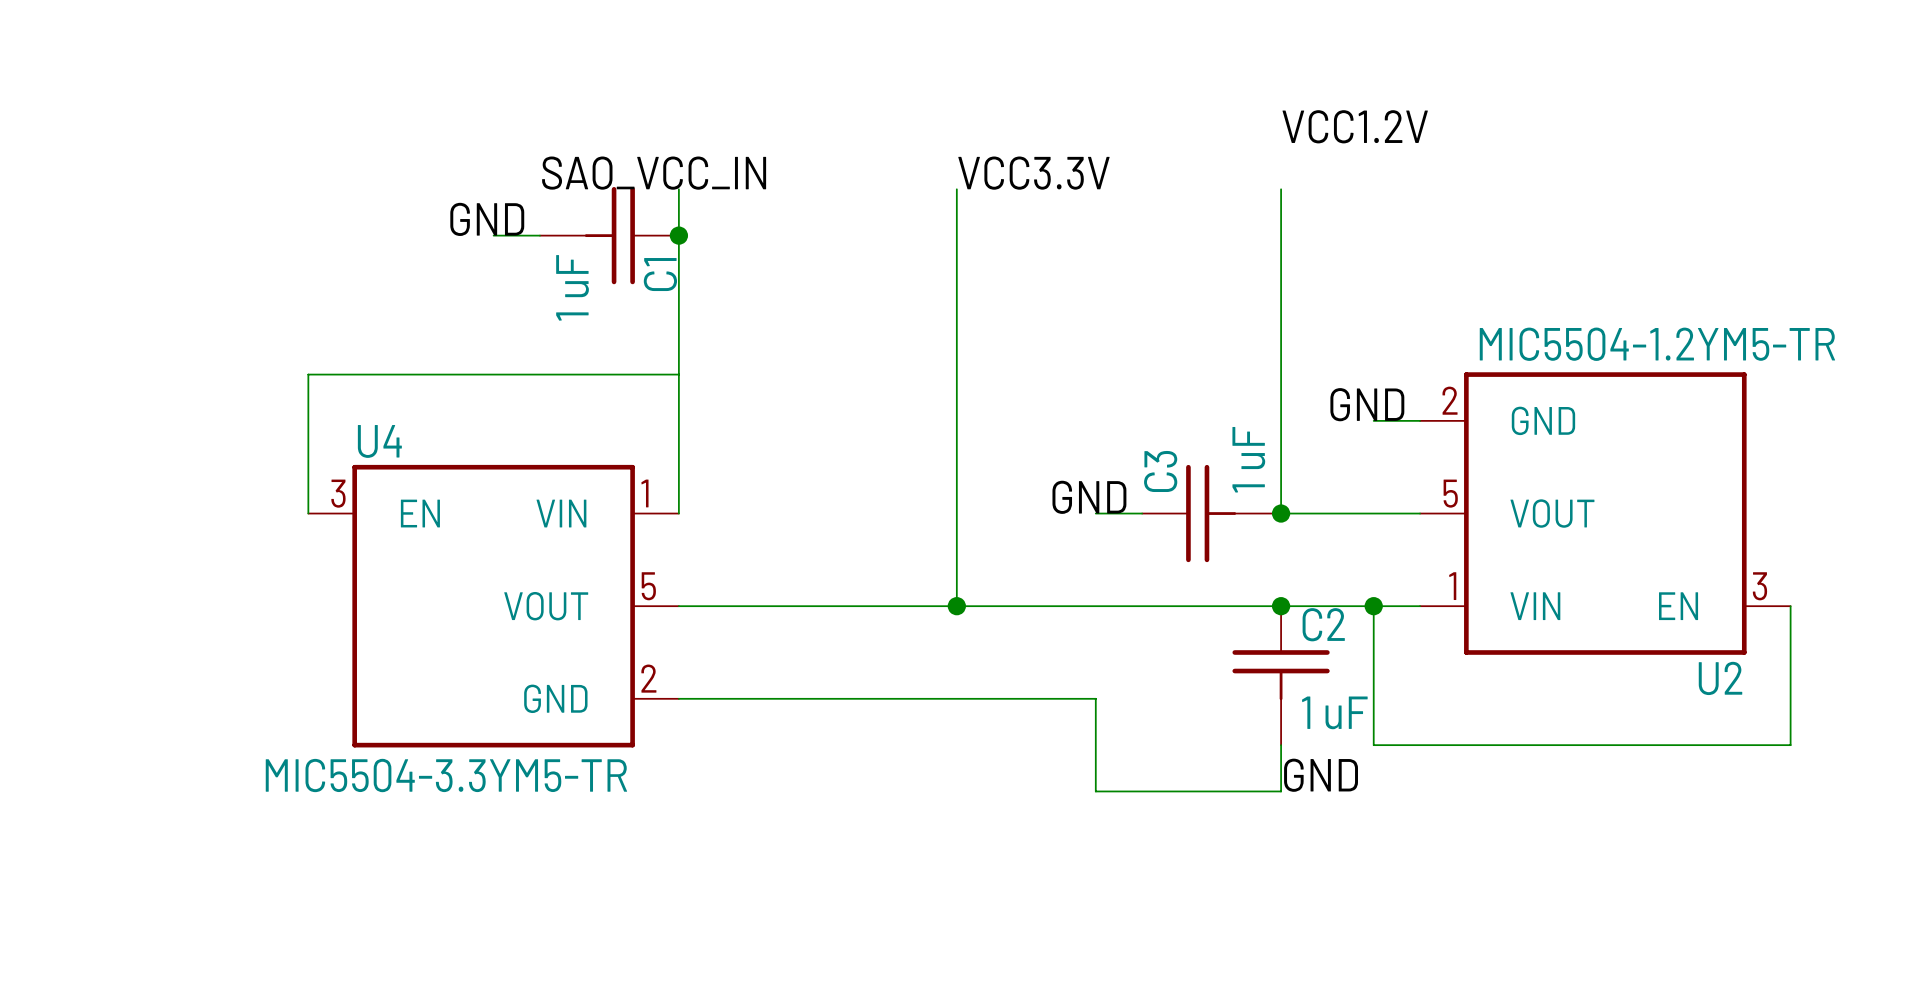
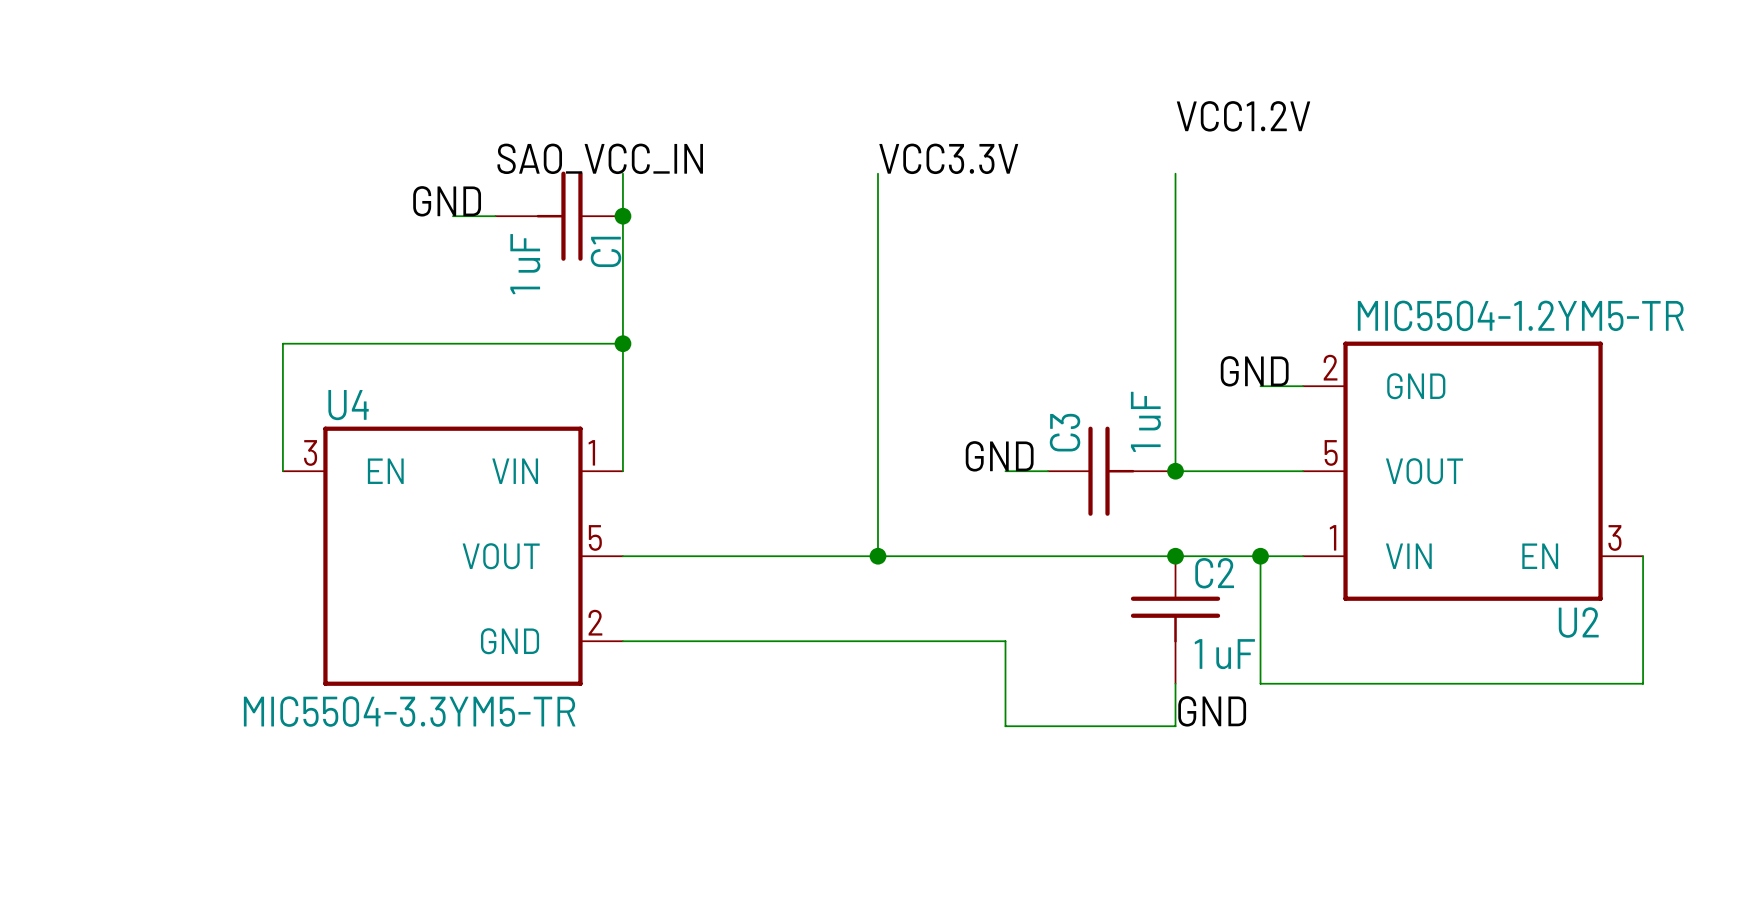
junction: none -> (622, 343)

